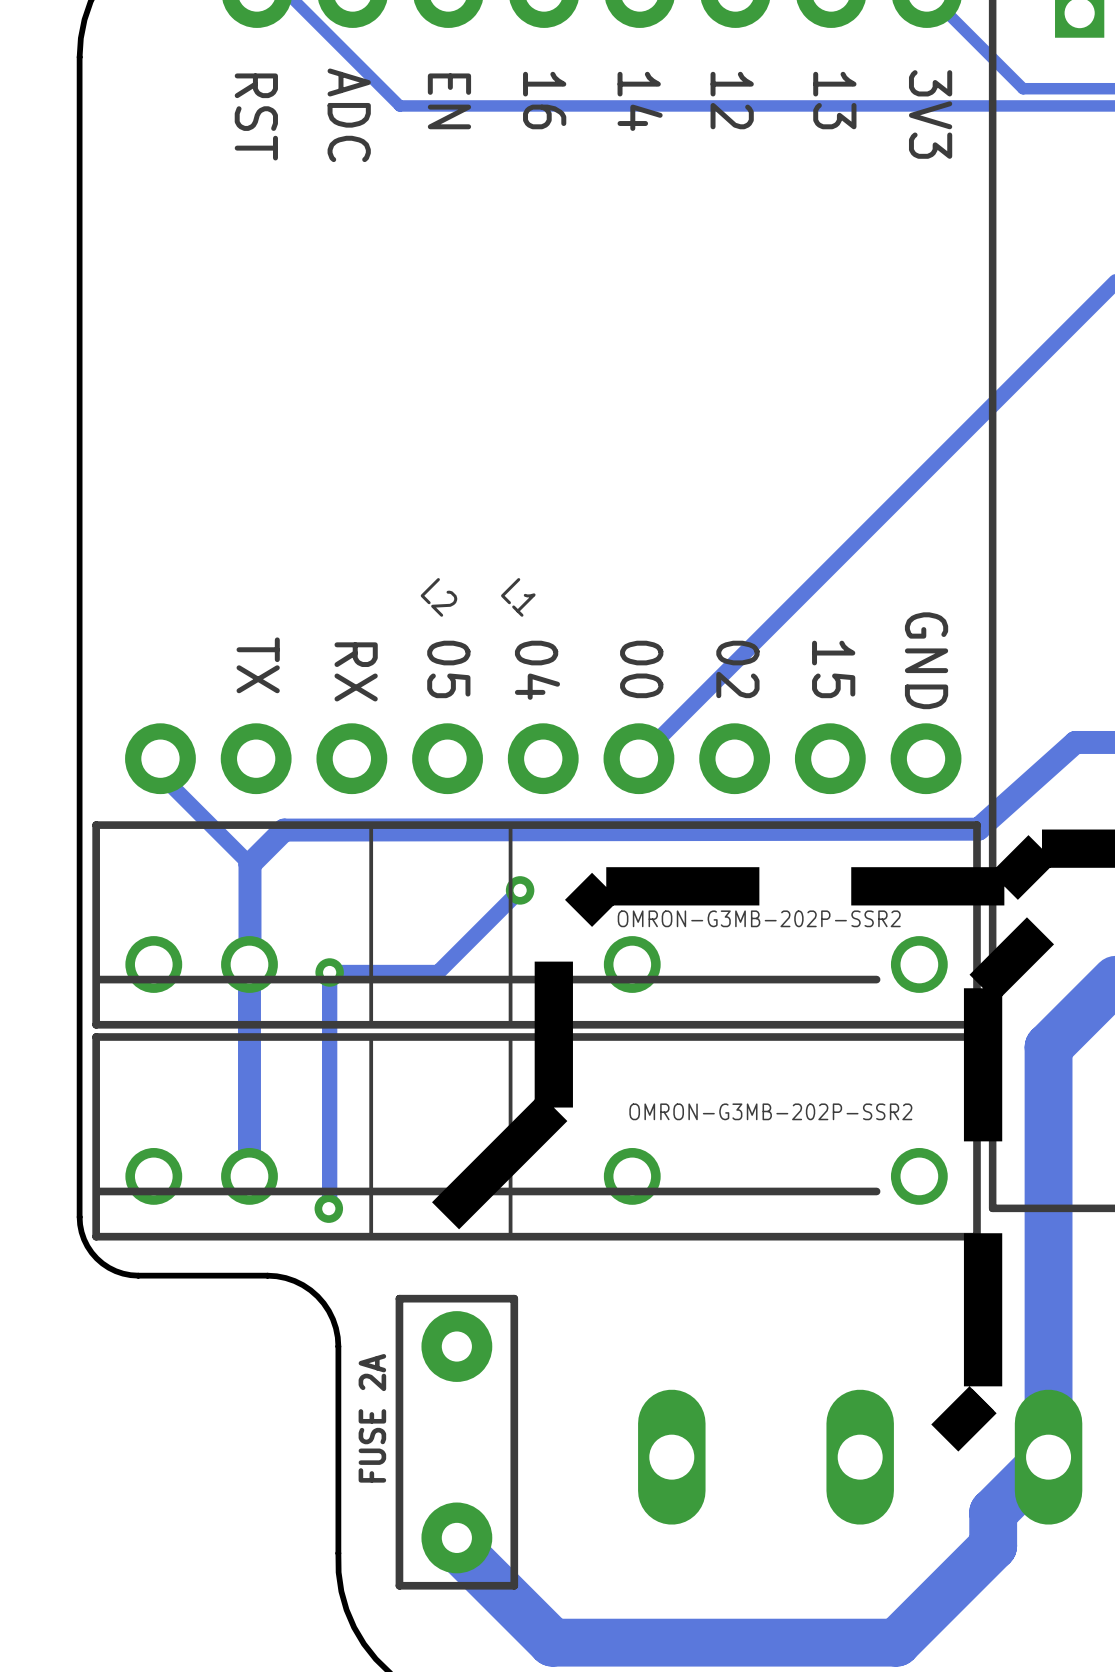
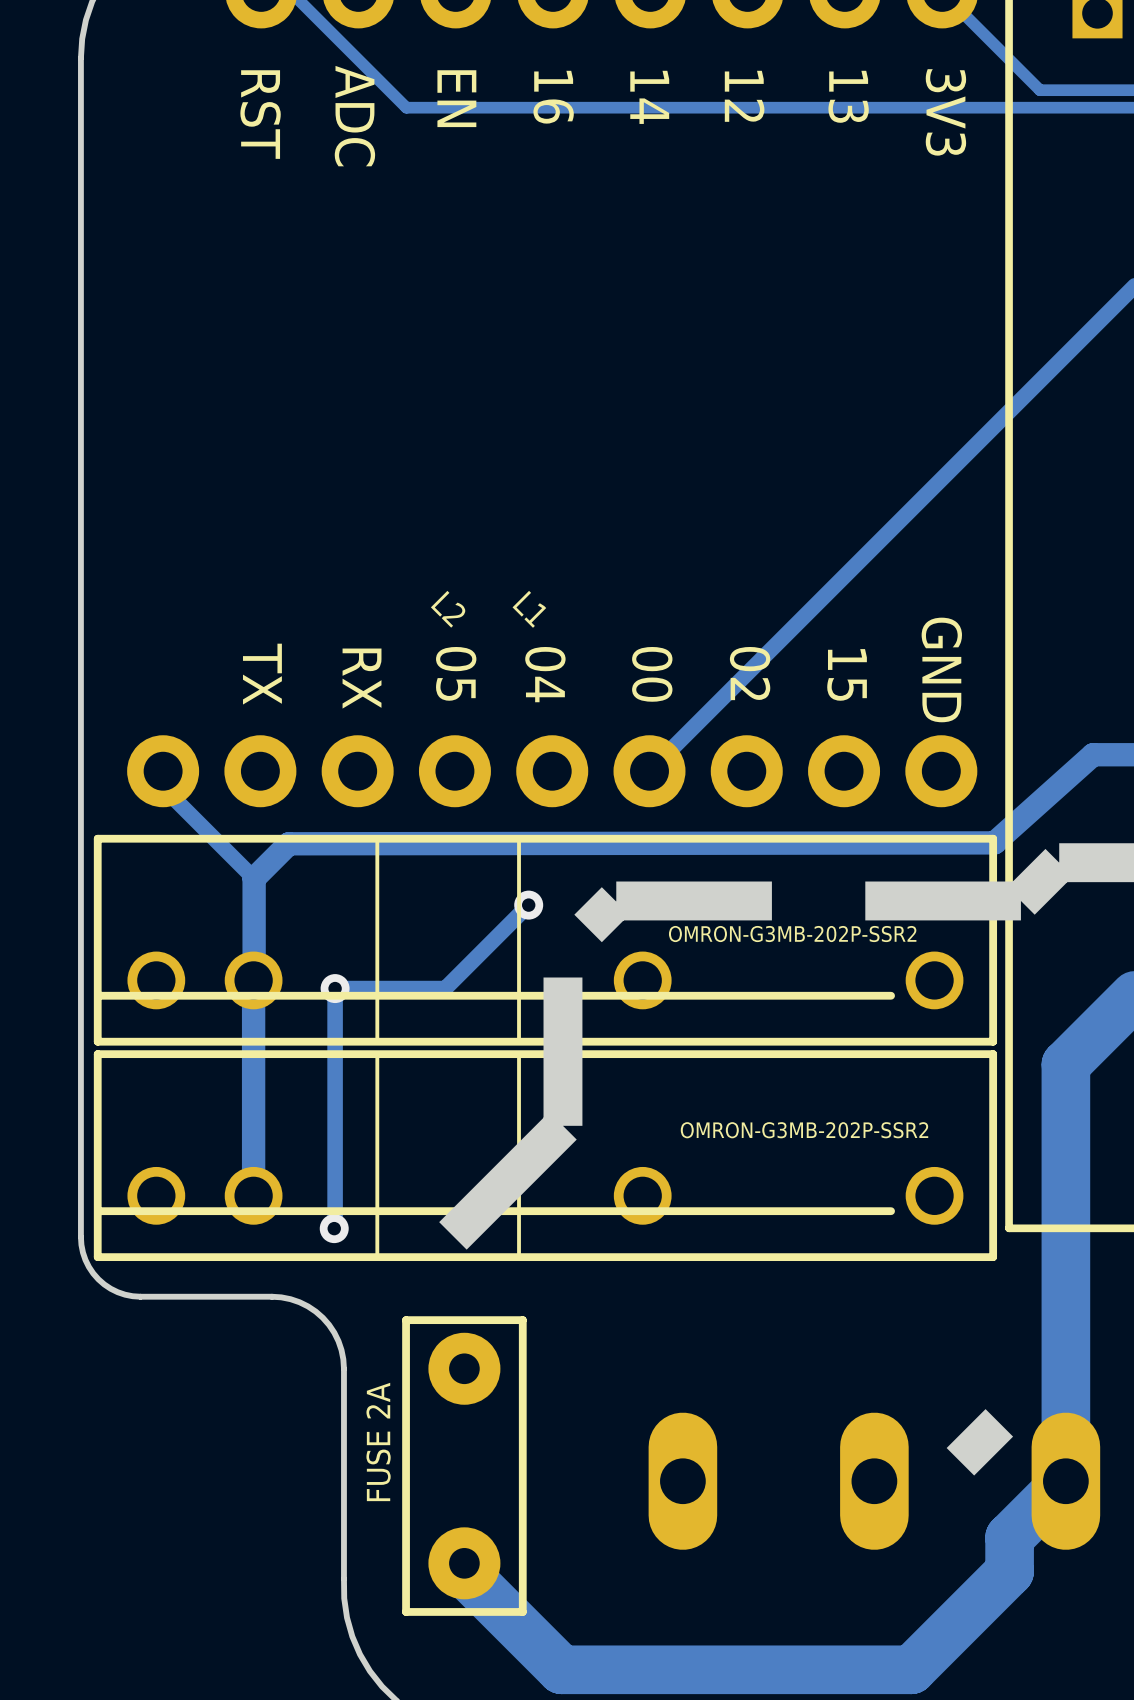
board edge: (1040, 930) (983, 988) (983, 1399) (954, 1428) -> none

